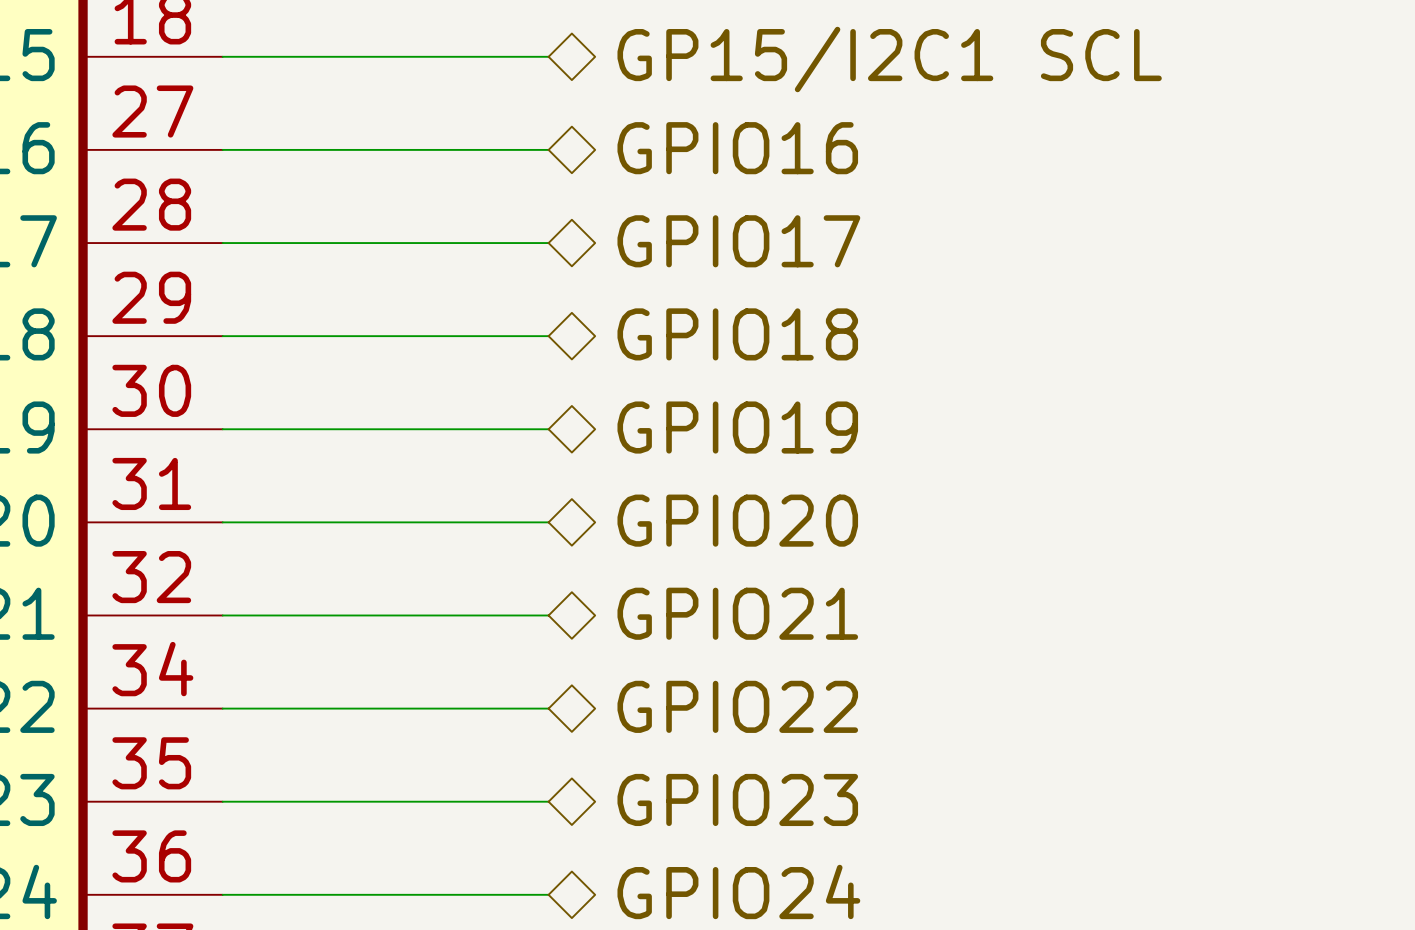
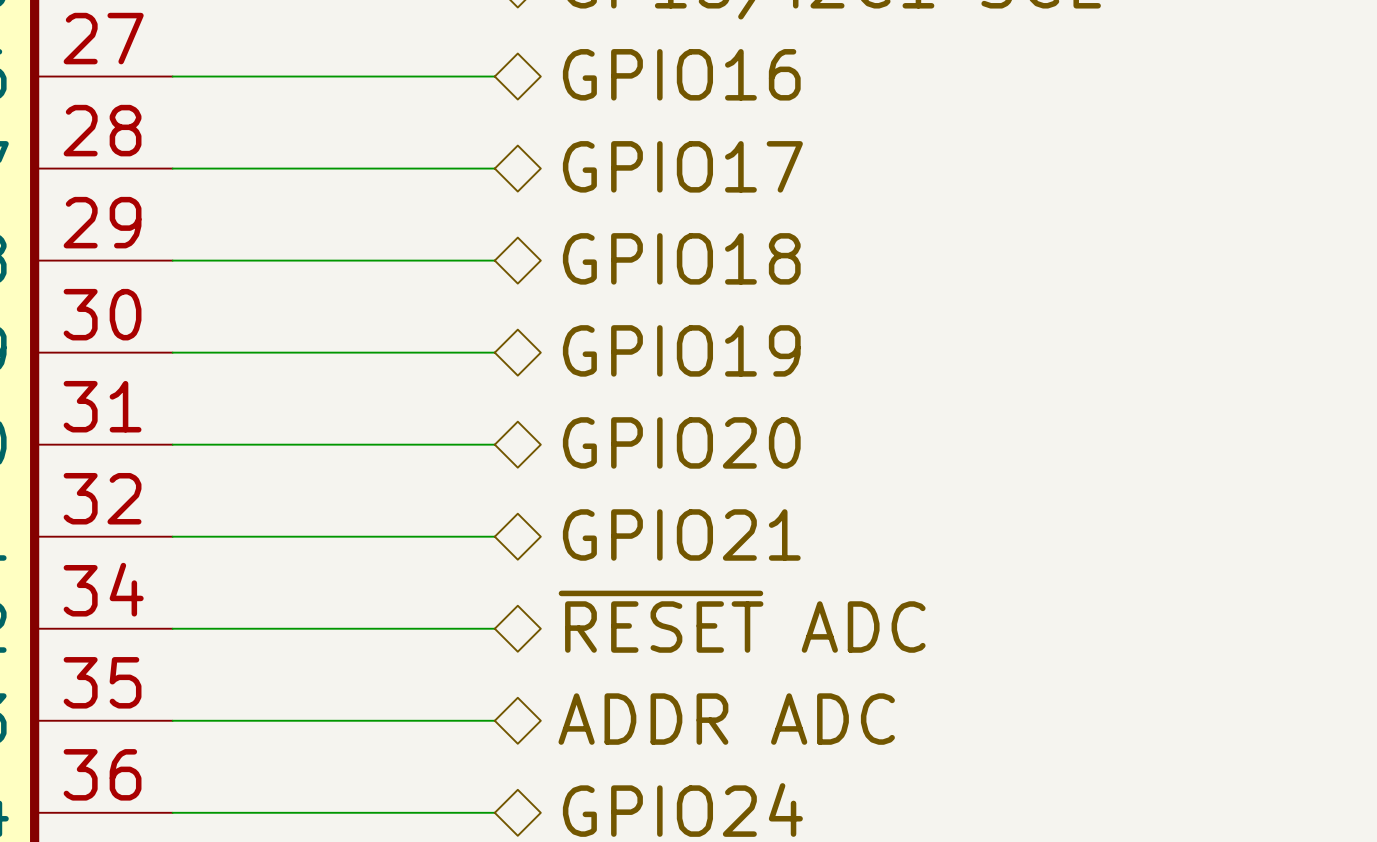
hierarchical label: GPIO22 (737, 706) -> ~{RESET} ADC (742, 621)
hierarchical label: GPIO23 (737, 799) -> ADDR ADC (726, 719)

